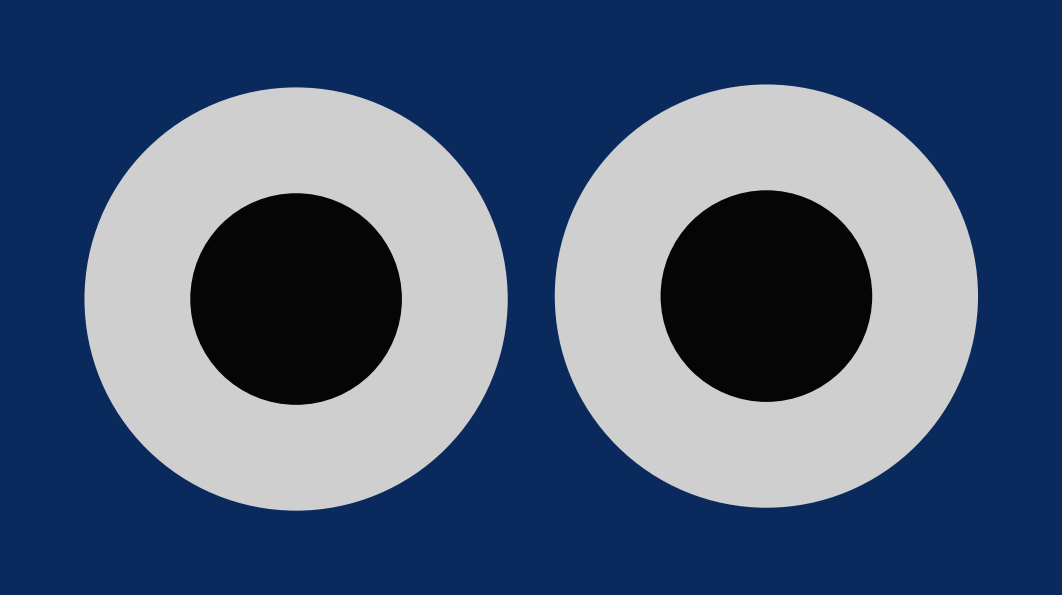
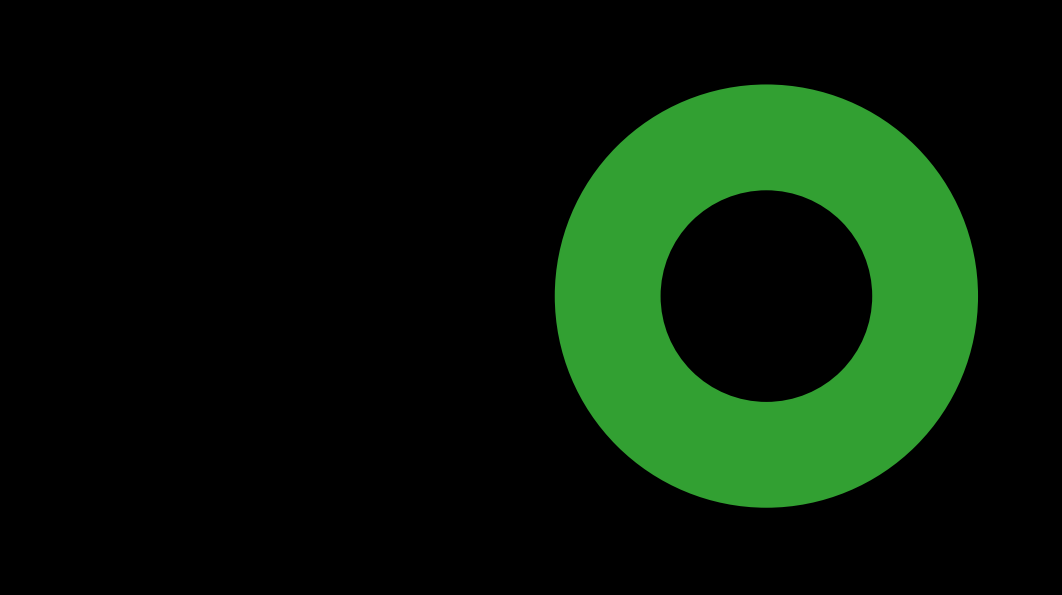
part: (296, 299) -> none

